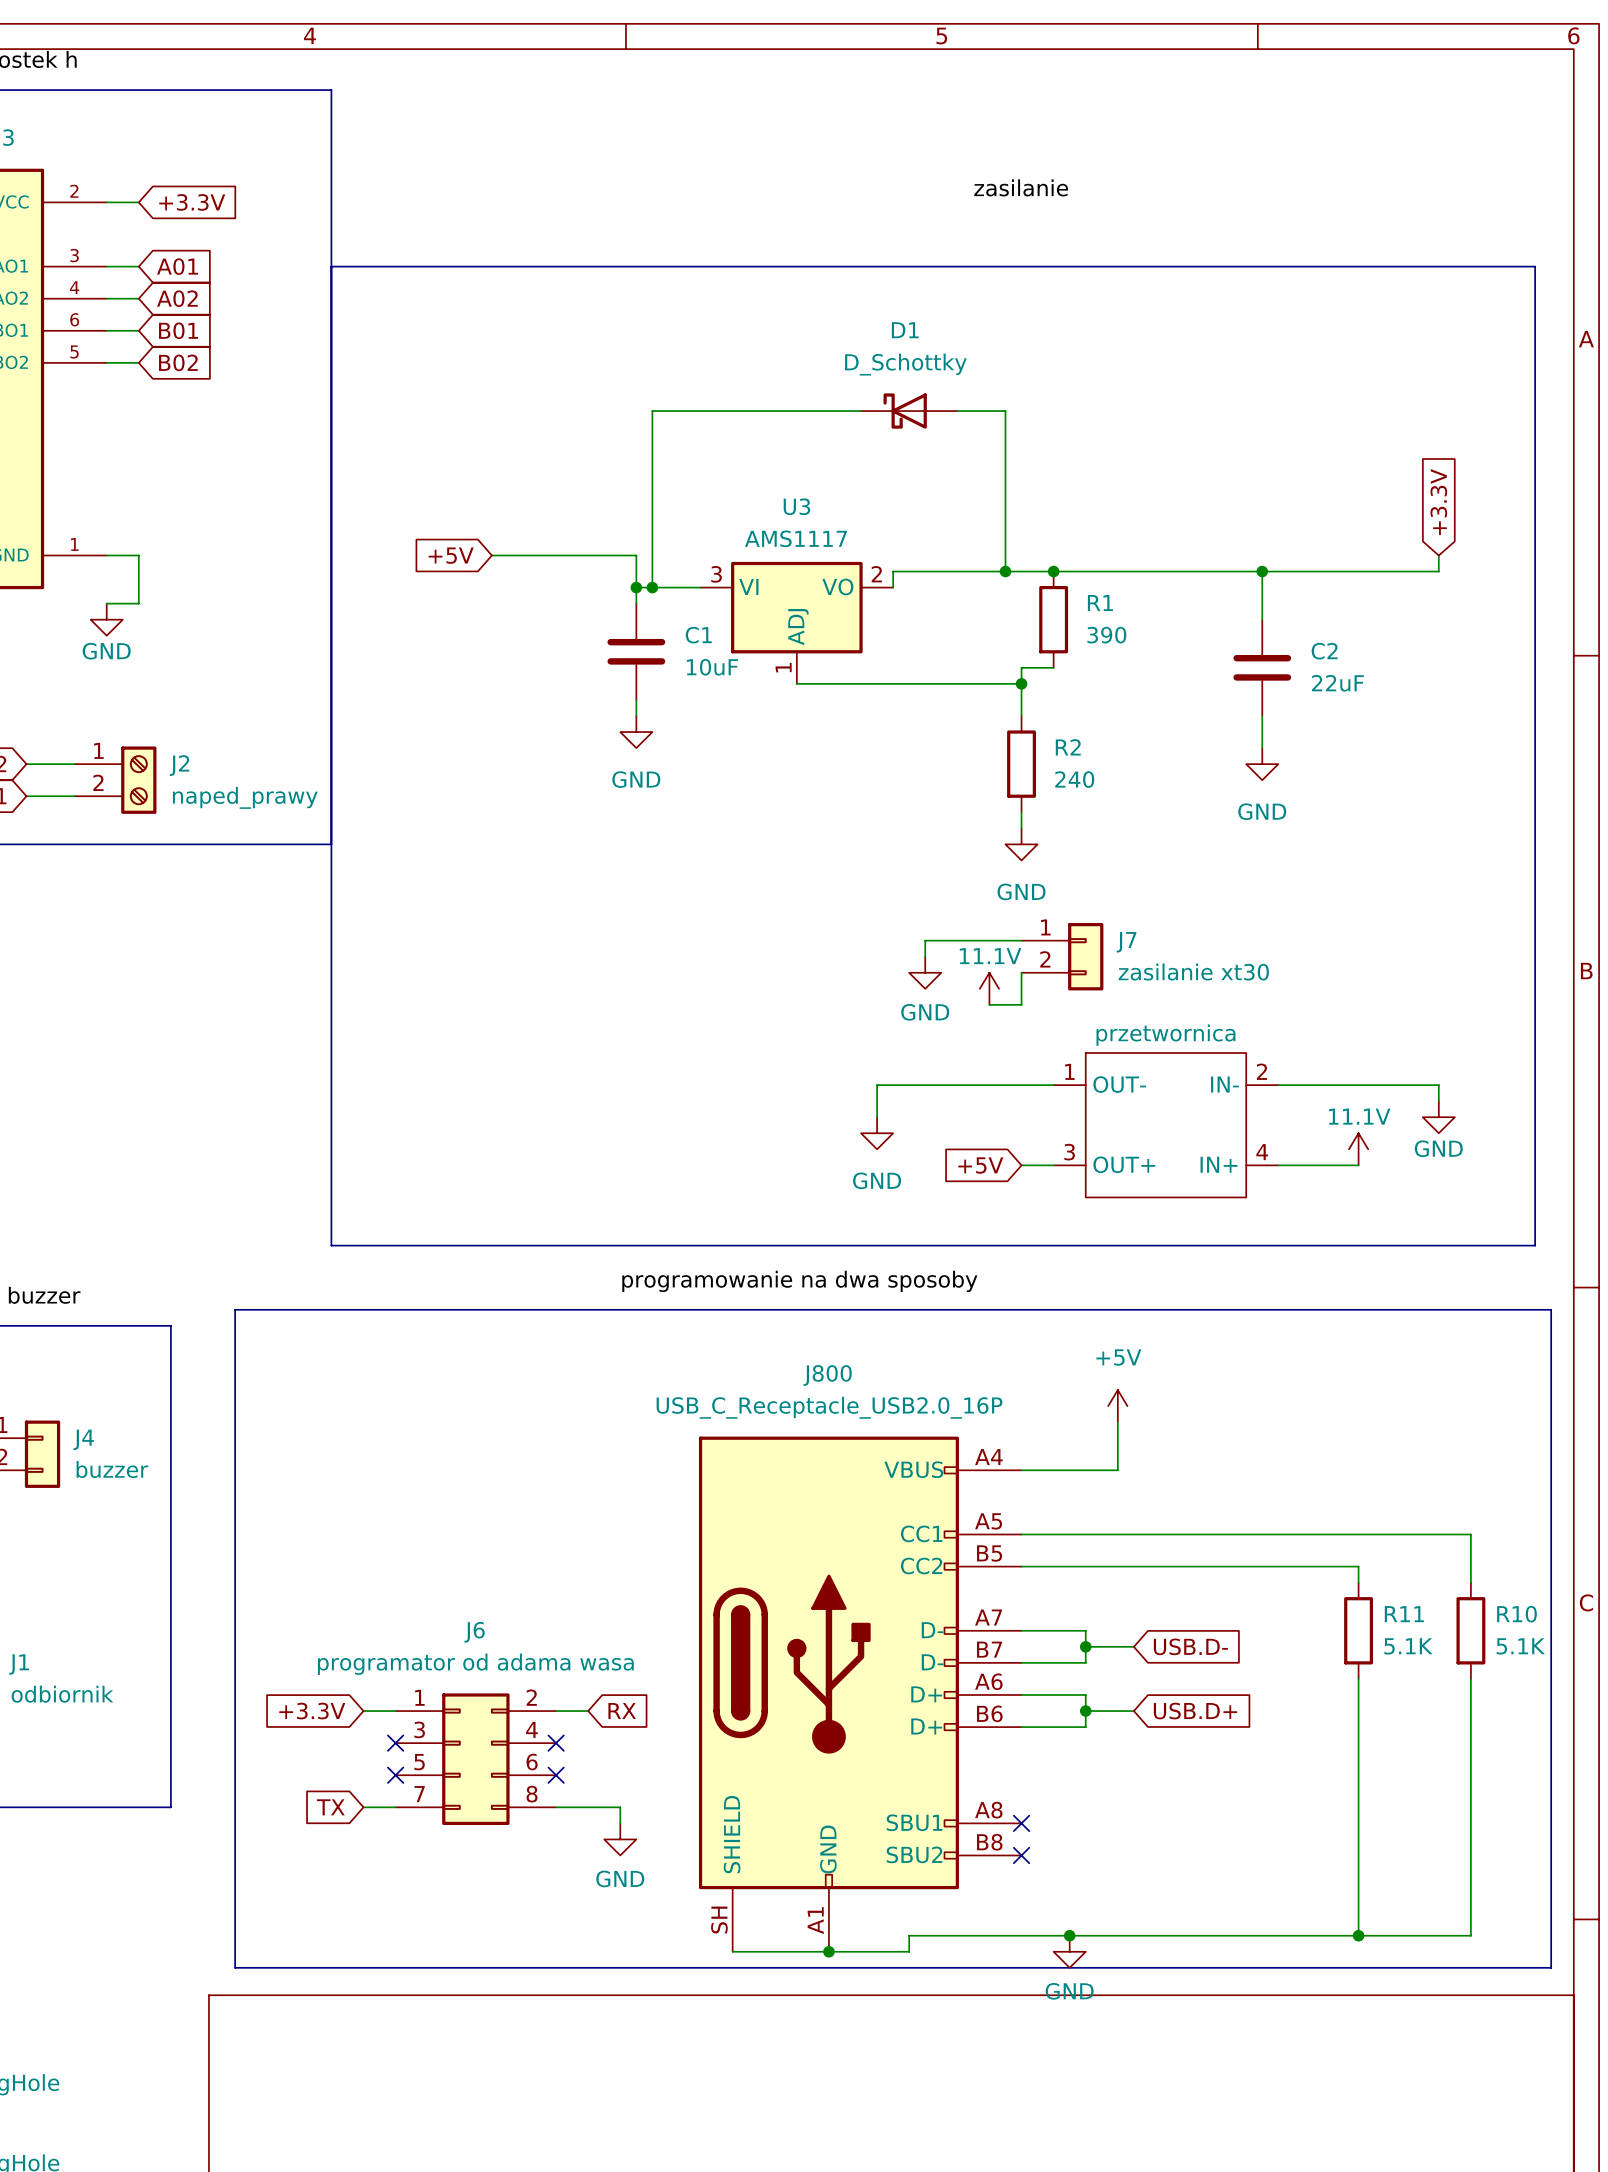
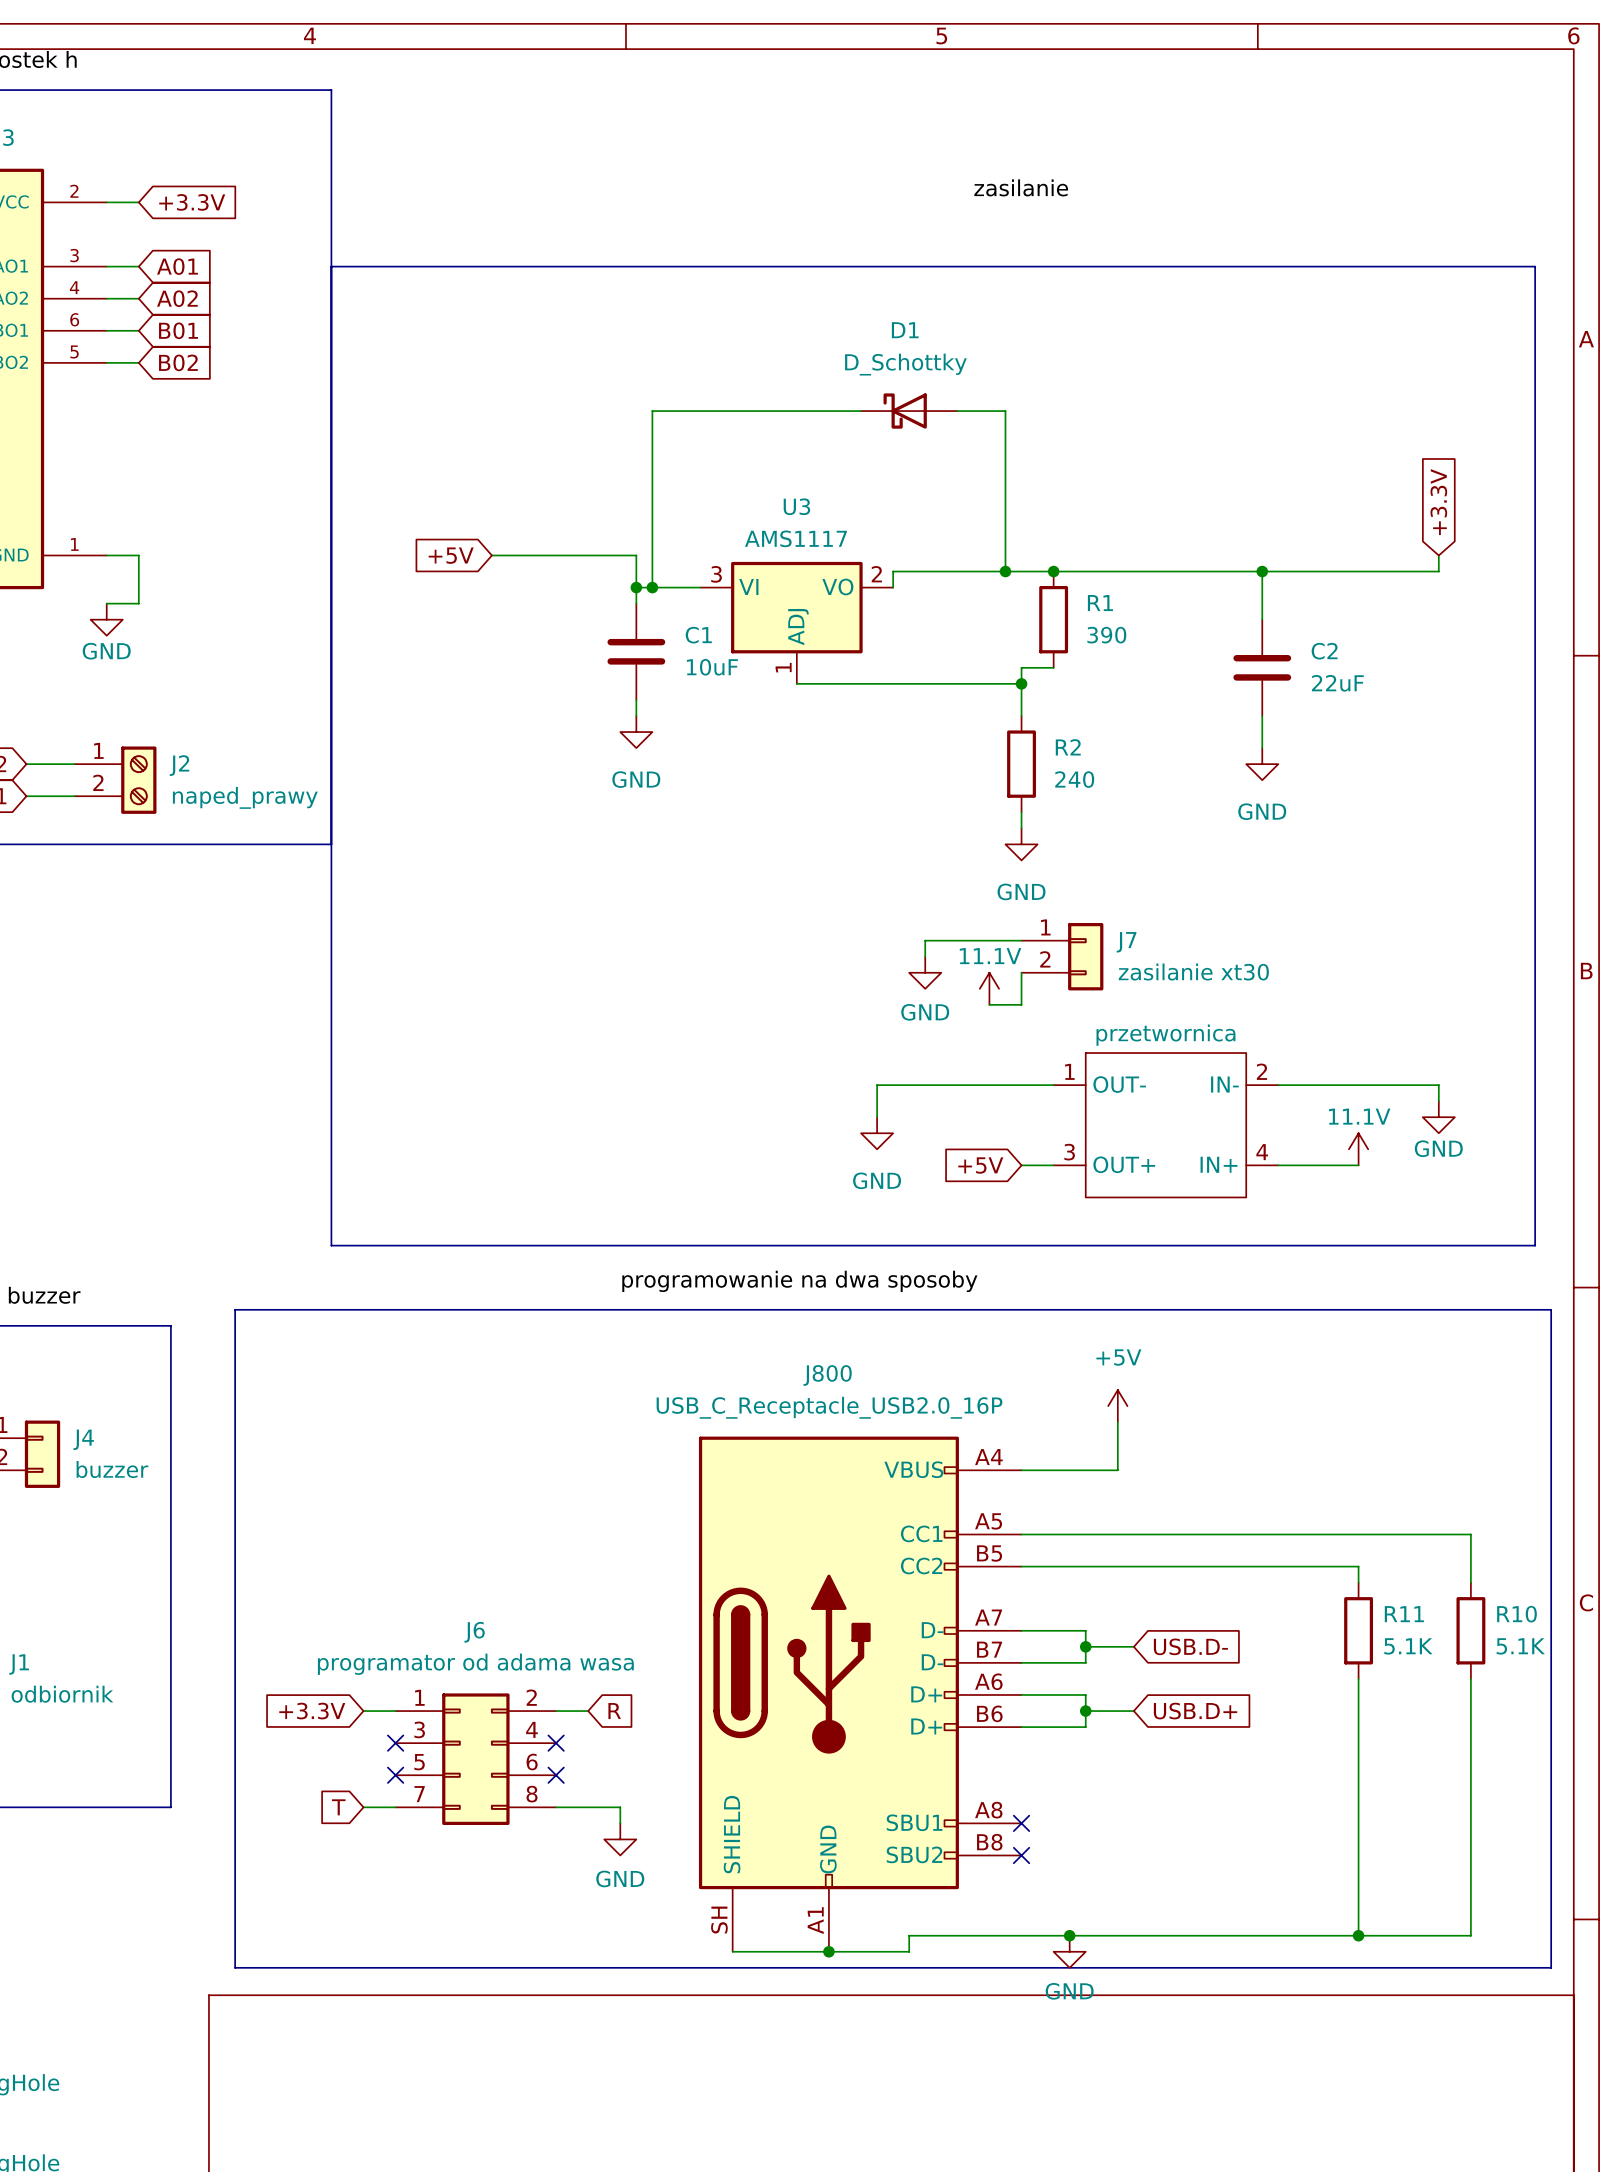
global label: RX (622, 1711) -> R (614, 1711)
global label: TX (330, 1807) -> T (338, 1807)

